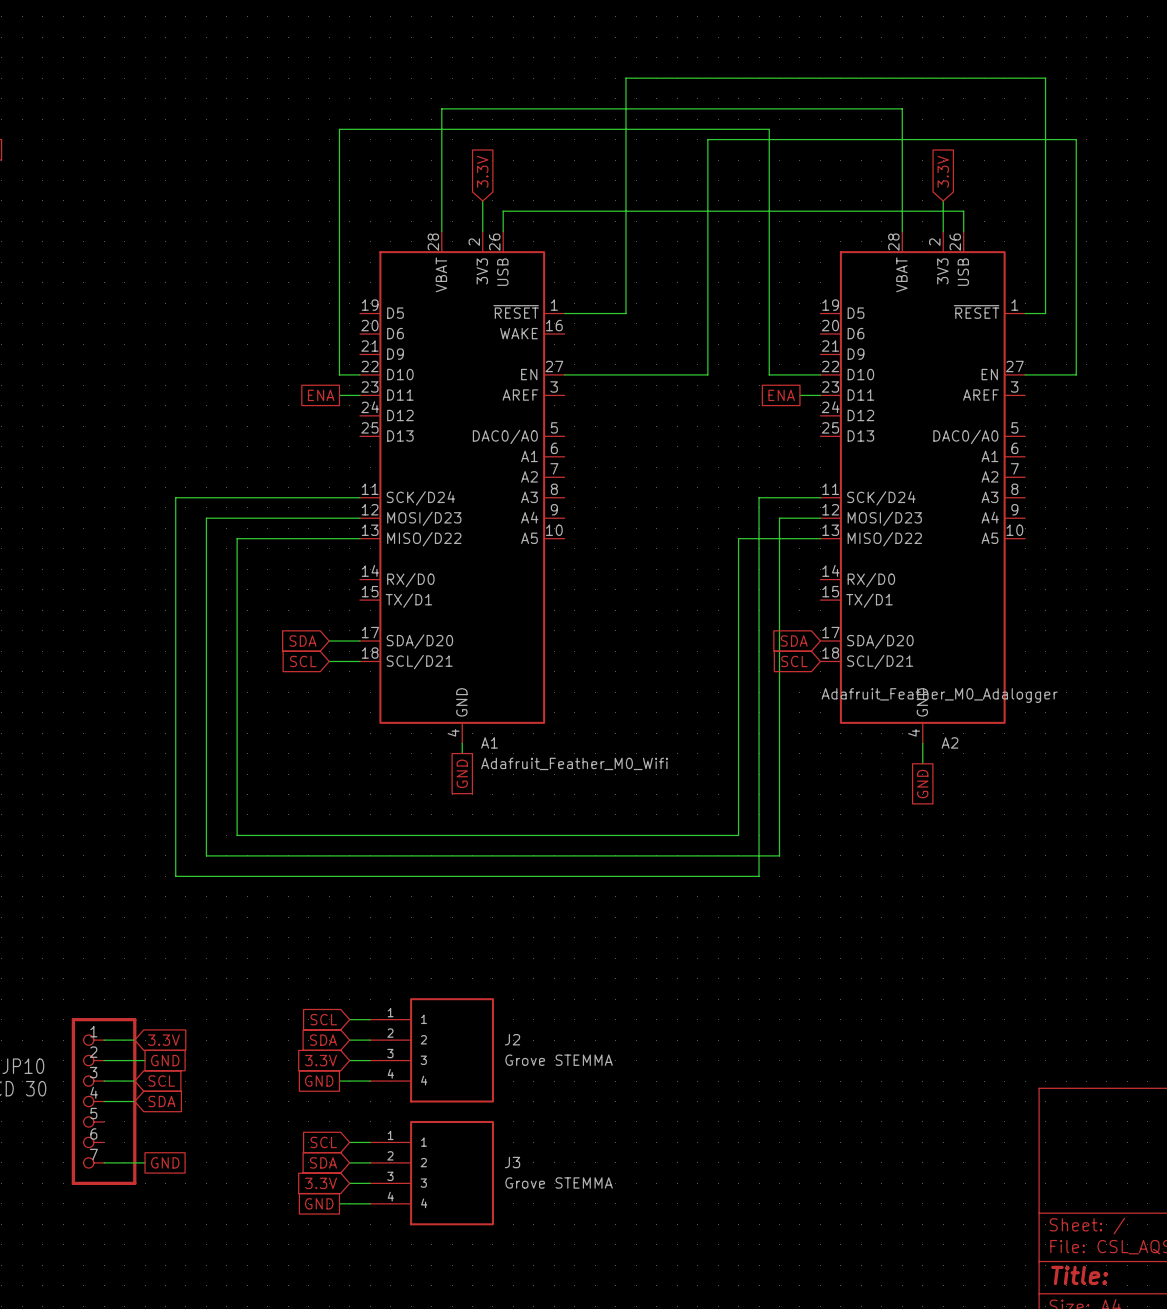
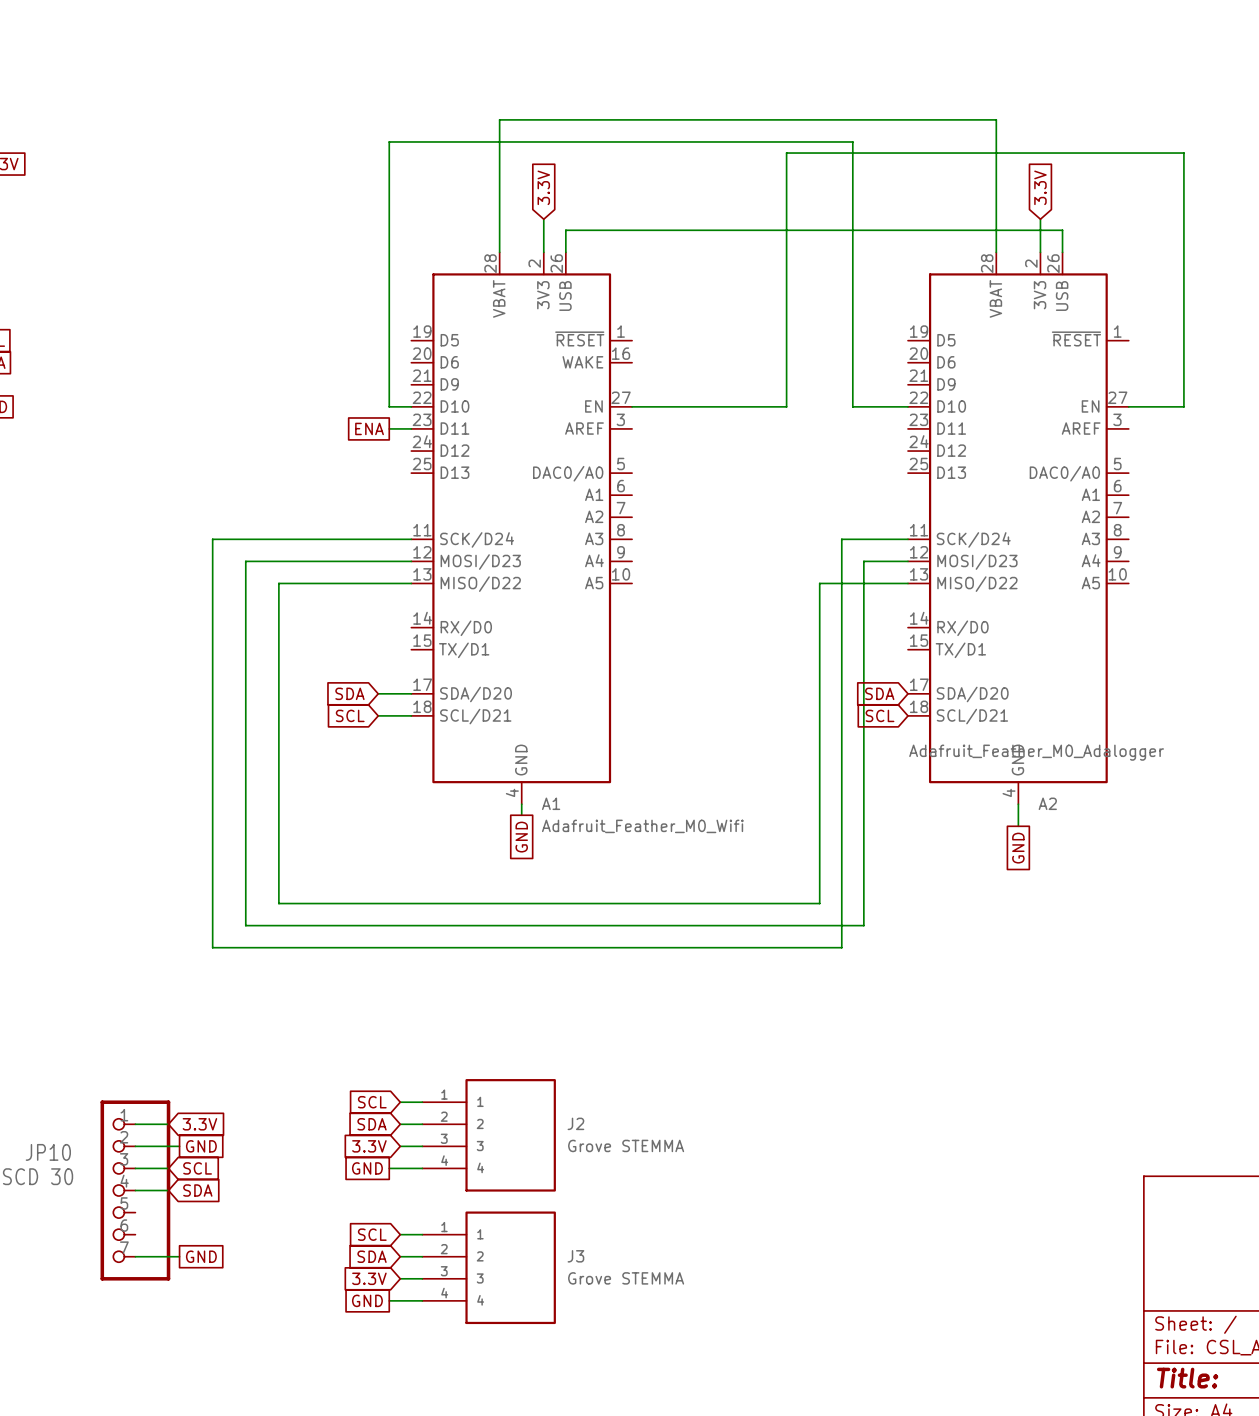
wire: (564, 313) (625, 313) (625, 78) (1045, 78) (1045, 313) (1025, 313) -> none
global label: ENA (781, 395) -> none
wire: (799, 395) (820, 395) -> none

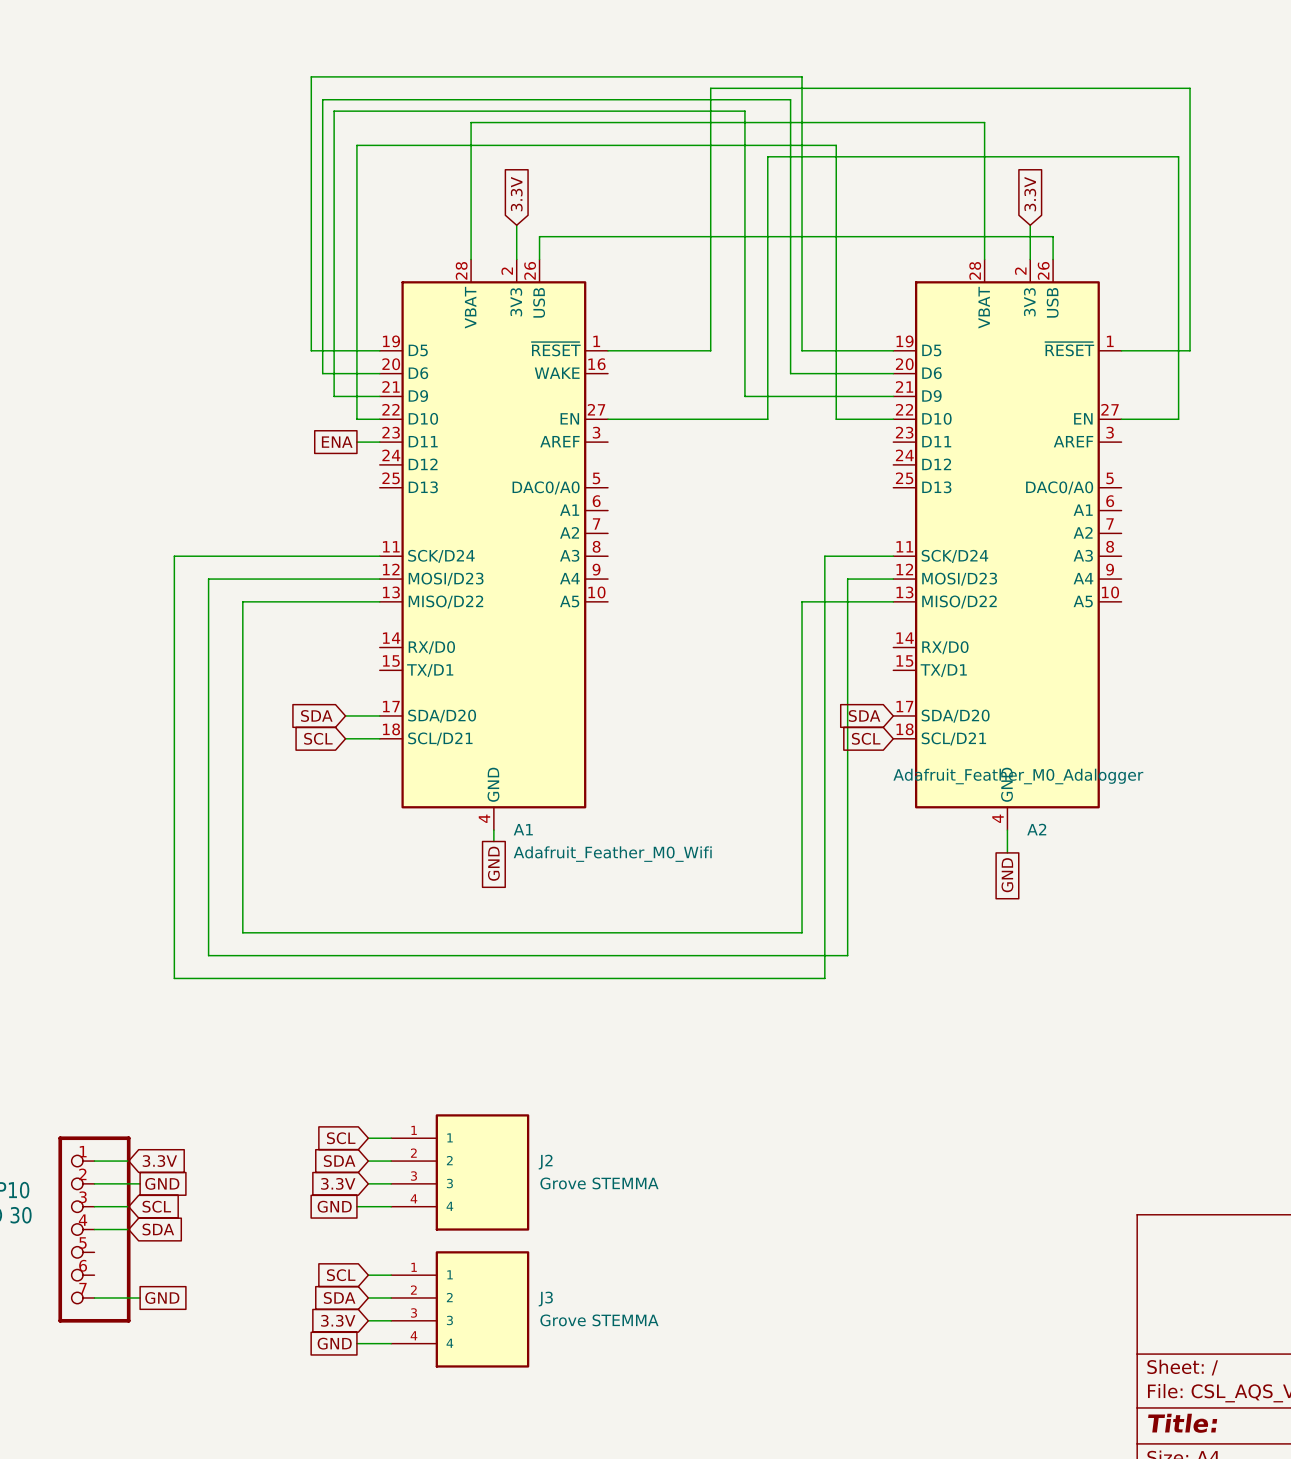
wire: none -> (379, 350) (311, 350) (311, 76) (802, 76) (802, 350) (893, 350)
wire: none -> (608, 350) (710, 350) (710, 88) (1190, 88) (1190, 350) (1121, 350)
wire: none -> (379, 373) (322, 373) (322, 99) (790, 99) (790, 373) (893, 373)
wire: none -> (379, 396) (334, 396) (334, 111) (744, 111) (744, 396) (893, 396)

